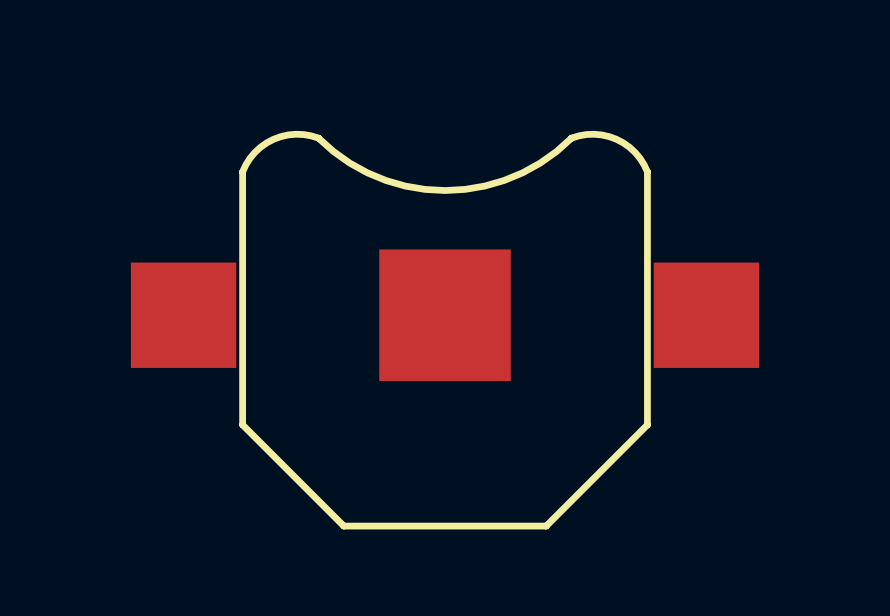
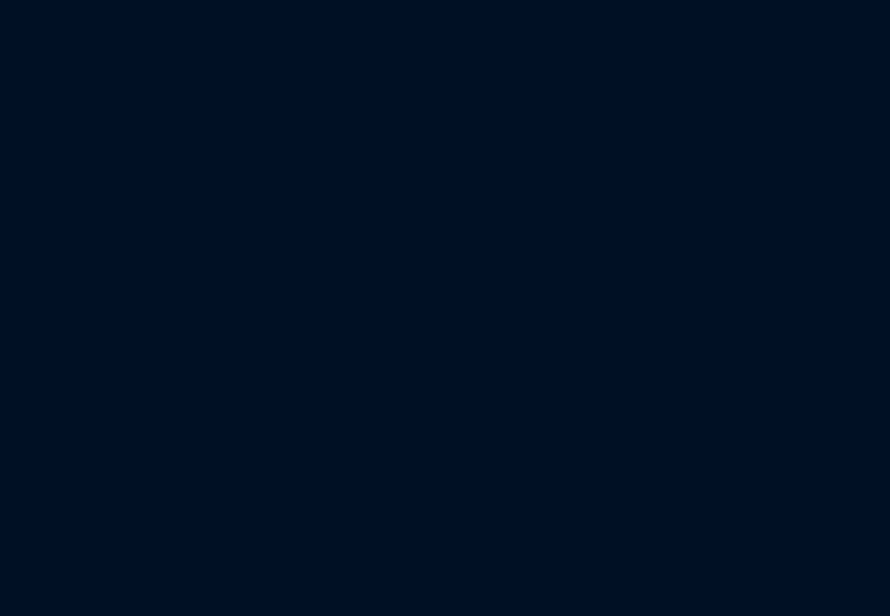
part: (445, 330) -> none

